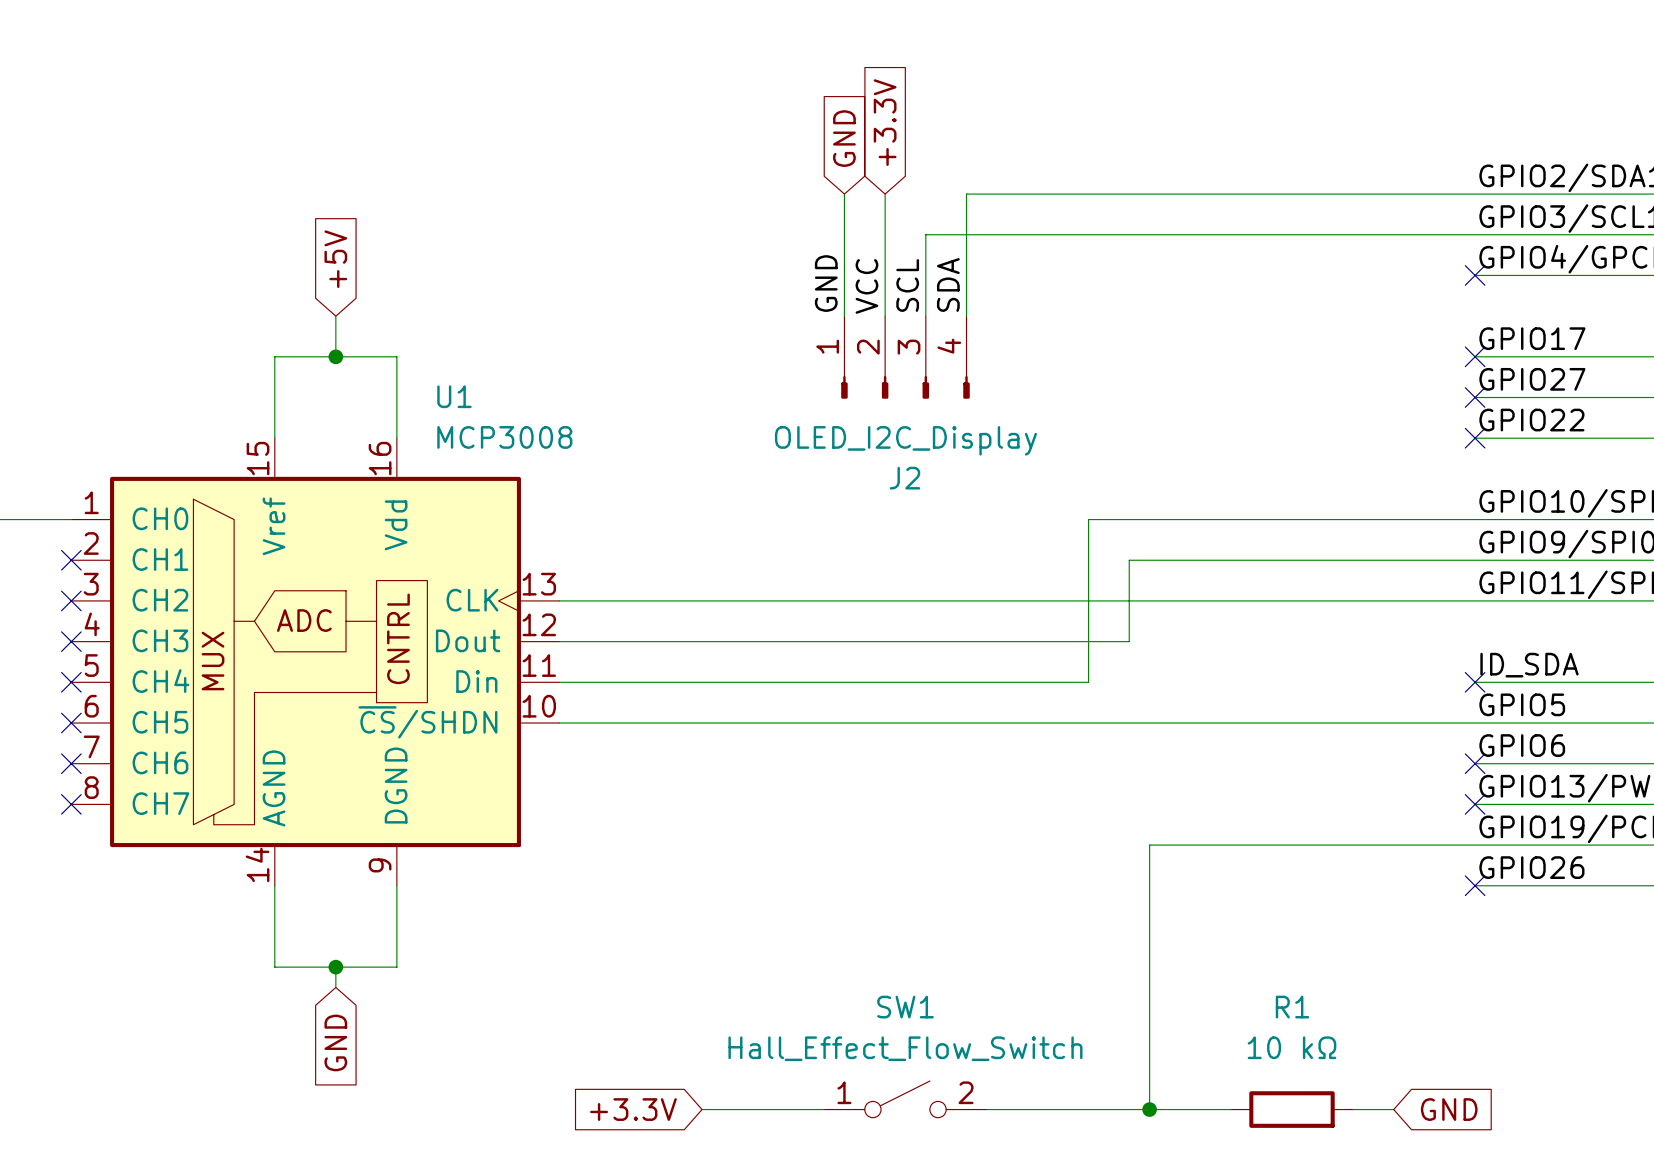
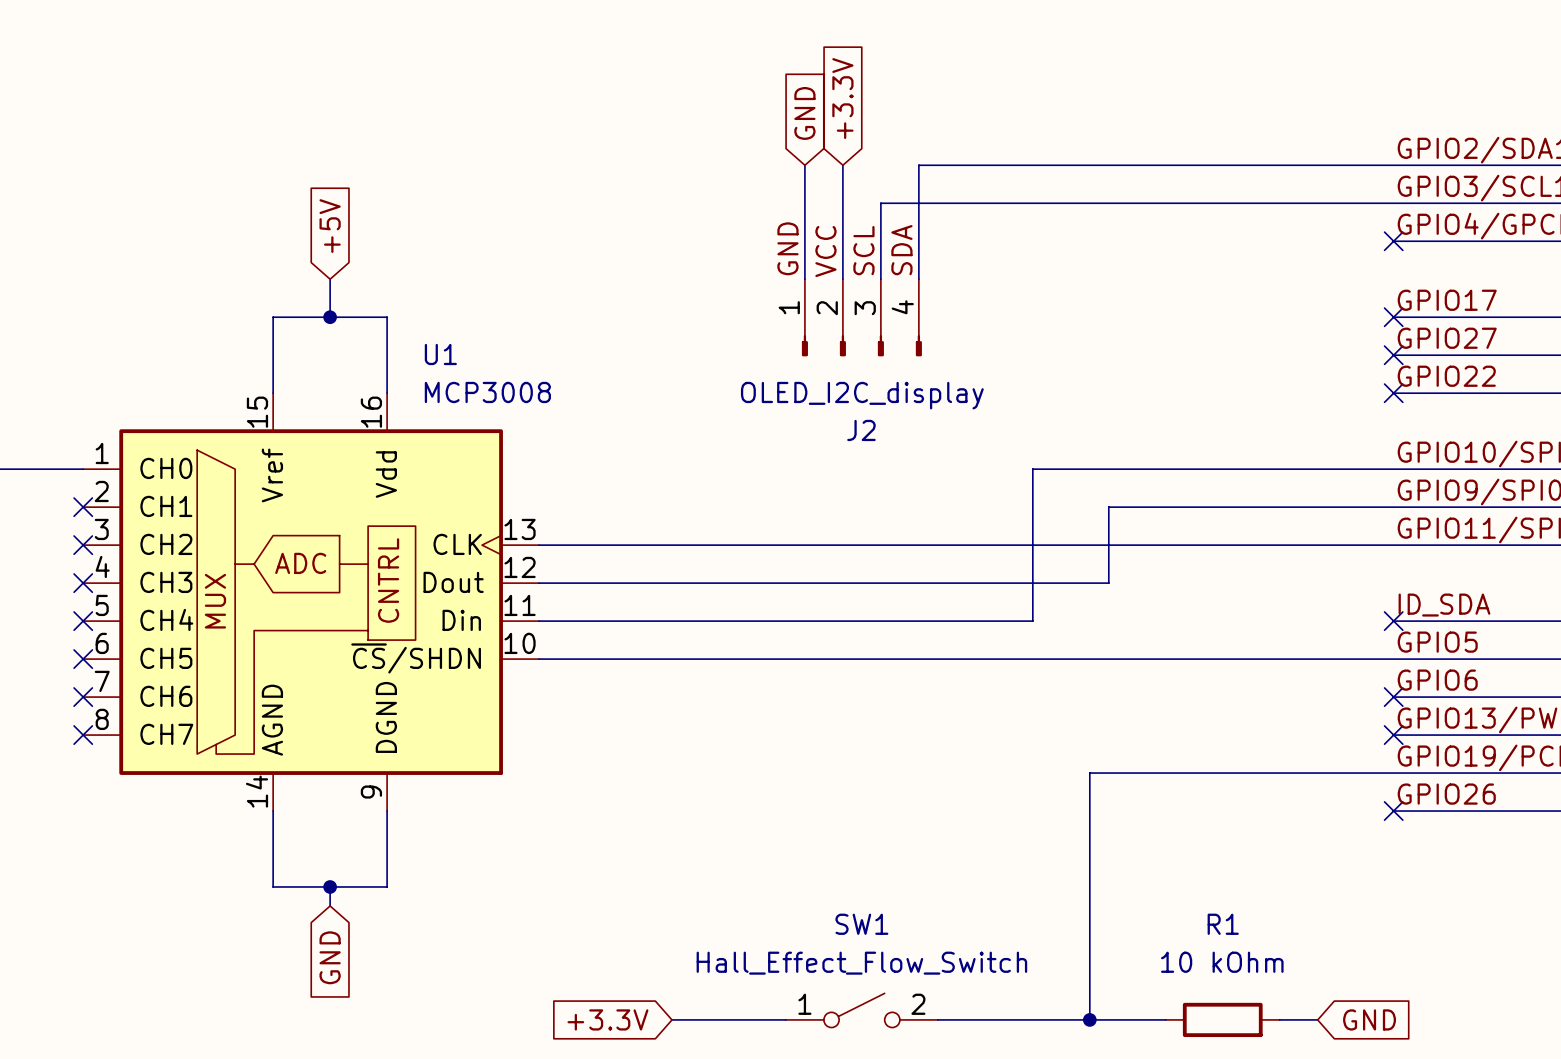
J2 value: OLED_I2C_Display (905, 440) -> OLED_I2C_display (862, 395)
wire: (1169, 560) (1129, 560) (1129, 641) -> (1108, 507) (1108, 583) (1070, 583)
R1 value: 10 kΩ (1292, 1047) -> 10 kOhm (1222, 962)

